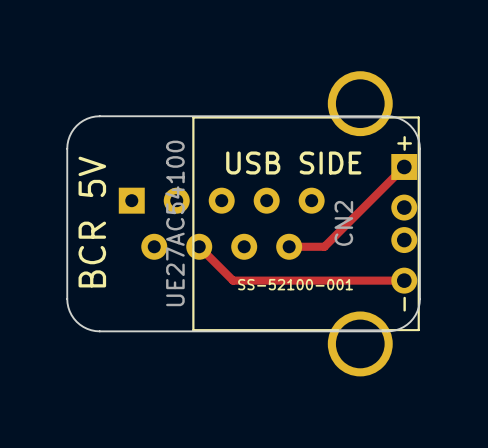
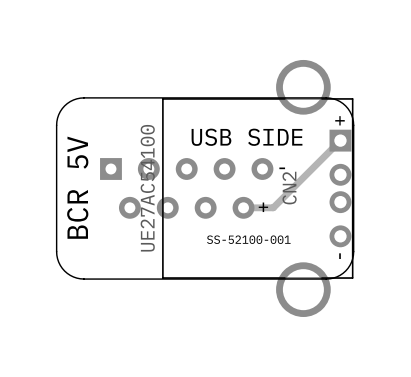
text: none -> - (282, 168)
track: (199, 246) (233, 280) (404, 280) -> none
text: none -> + (263, 207)

